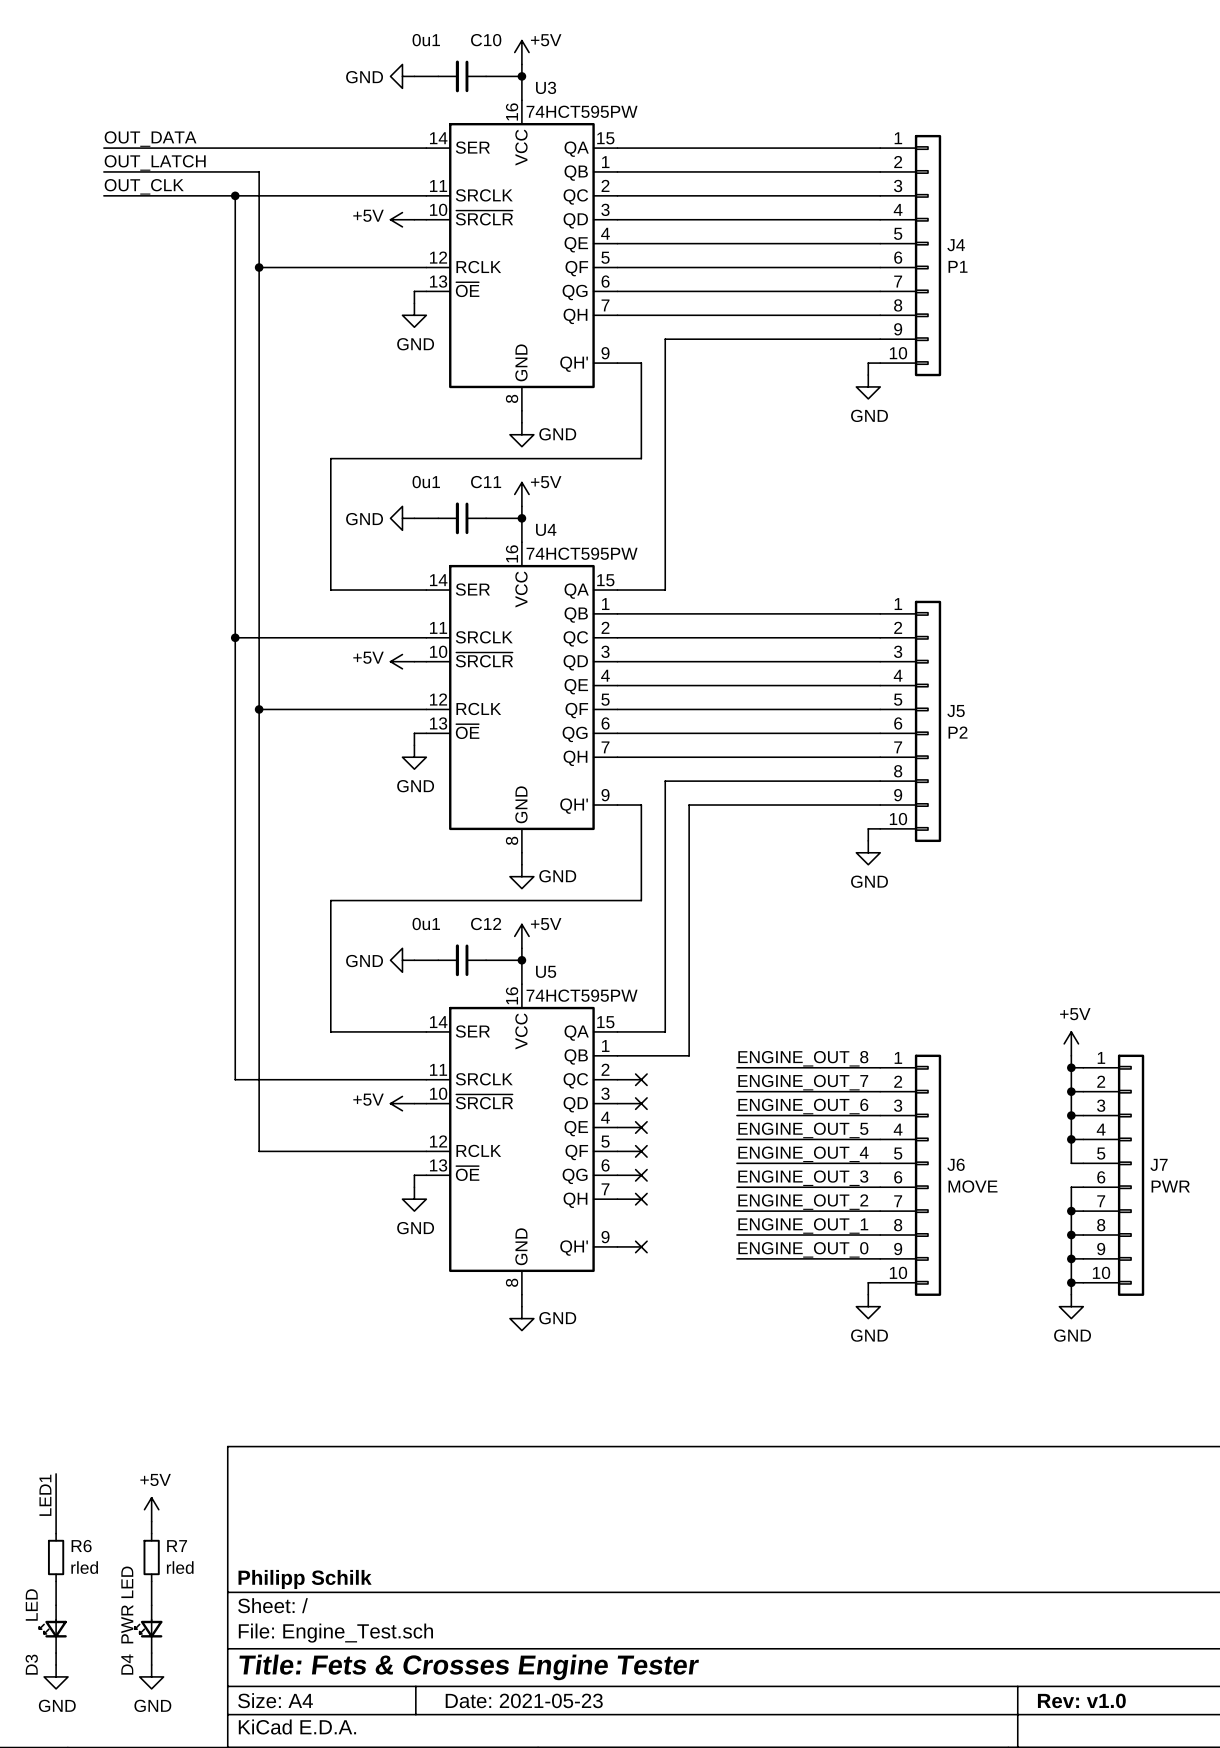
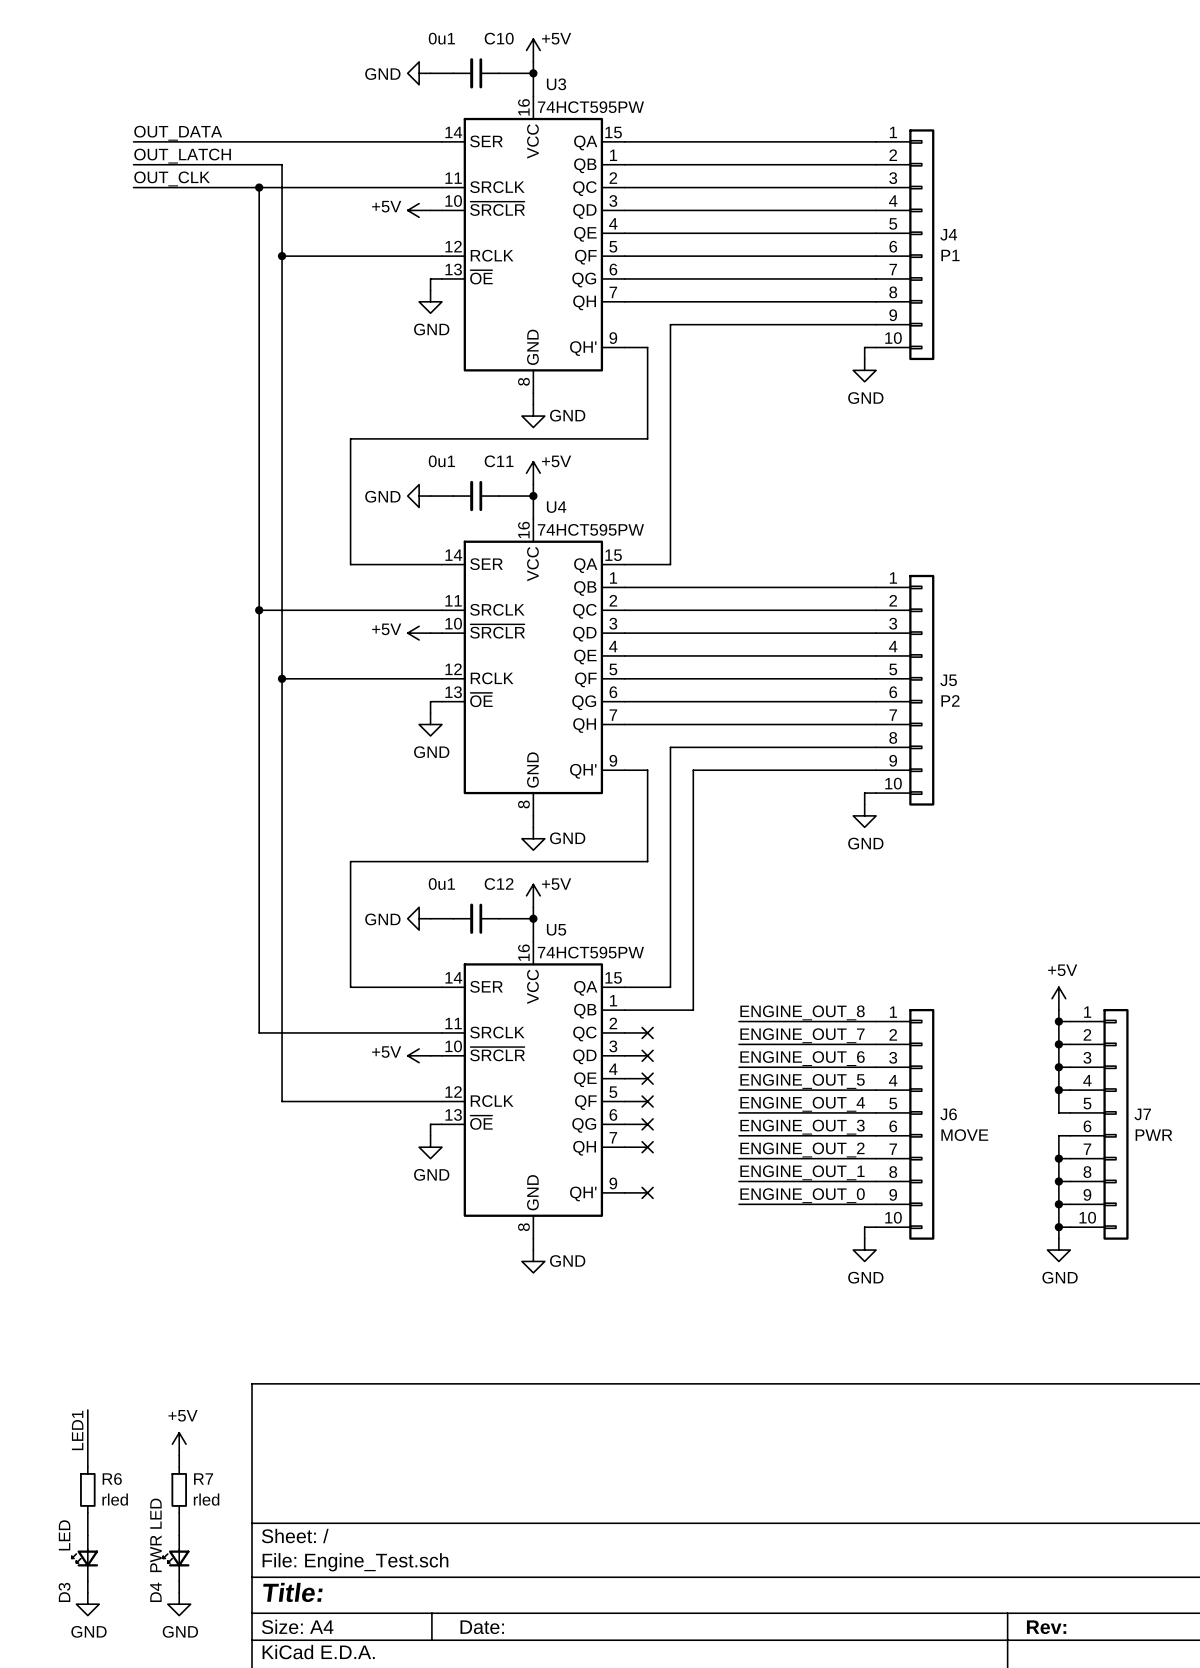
title block: Philipp Schilk (305, 1579) -> none
title block: Title: Fets & Crosses Engine Tester (469, 1667) -> Title: (292, 1592)
title block: Date: 2021-05-23 (524, 1700) -> Date: (482, 1627)
title block: Rev: v1.0 (1081, 1700) -> Rev: (1046, 1627)

